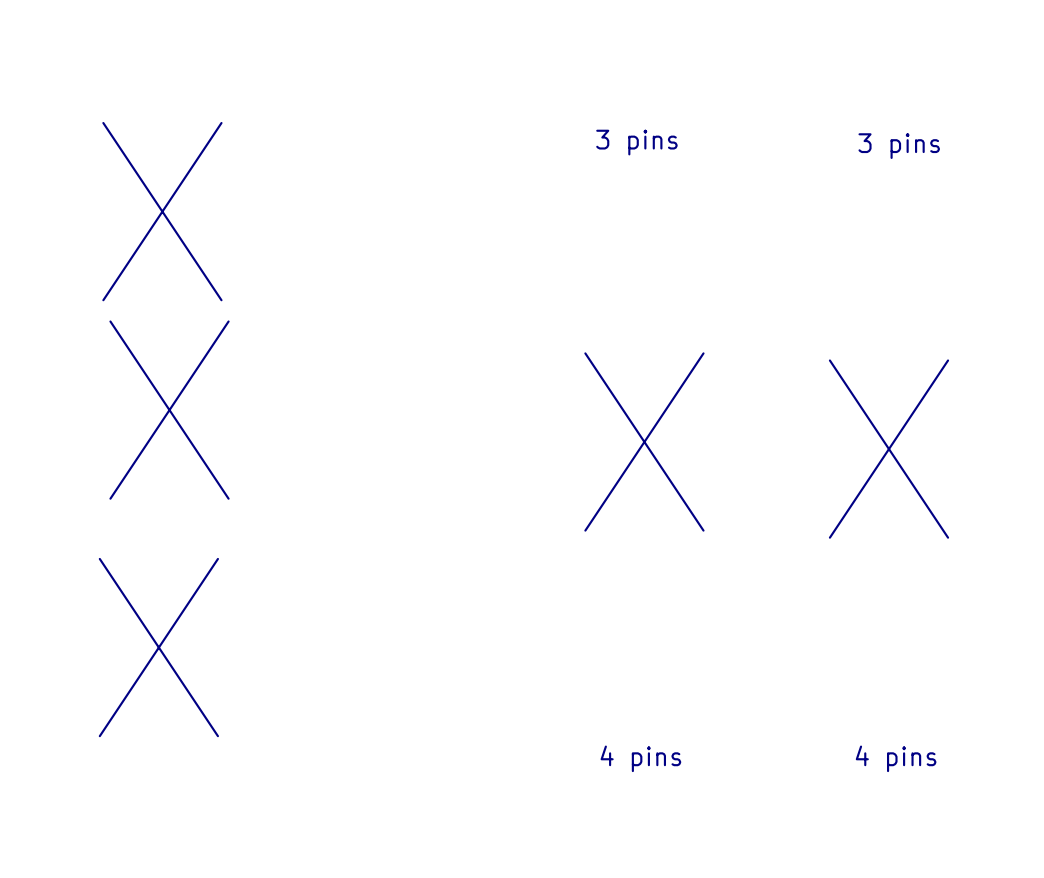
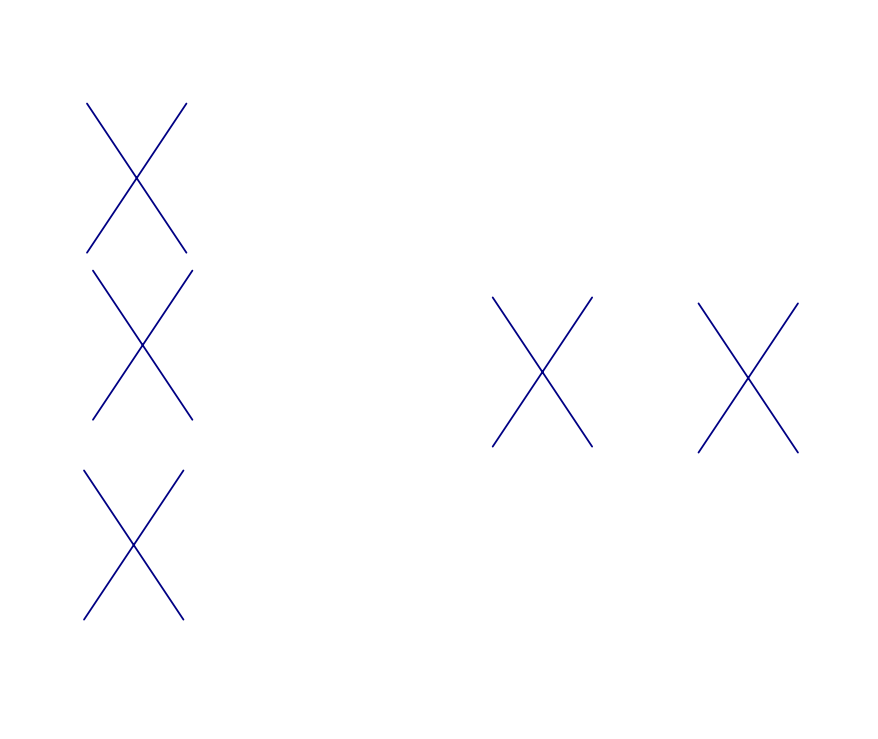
text: 3 pins (636, 142) -> none
text: 3 pins (899, 146) -> none
text: 4 pins (640, 758) -> none
text: 4 pins (896, 758) -> none

